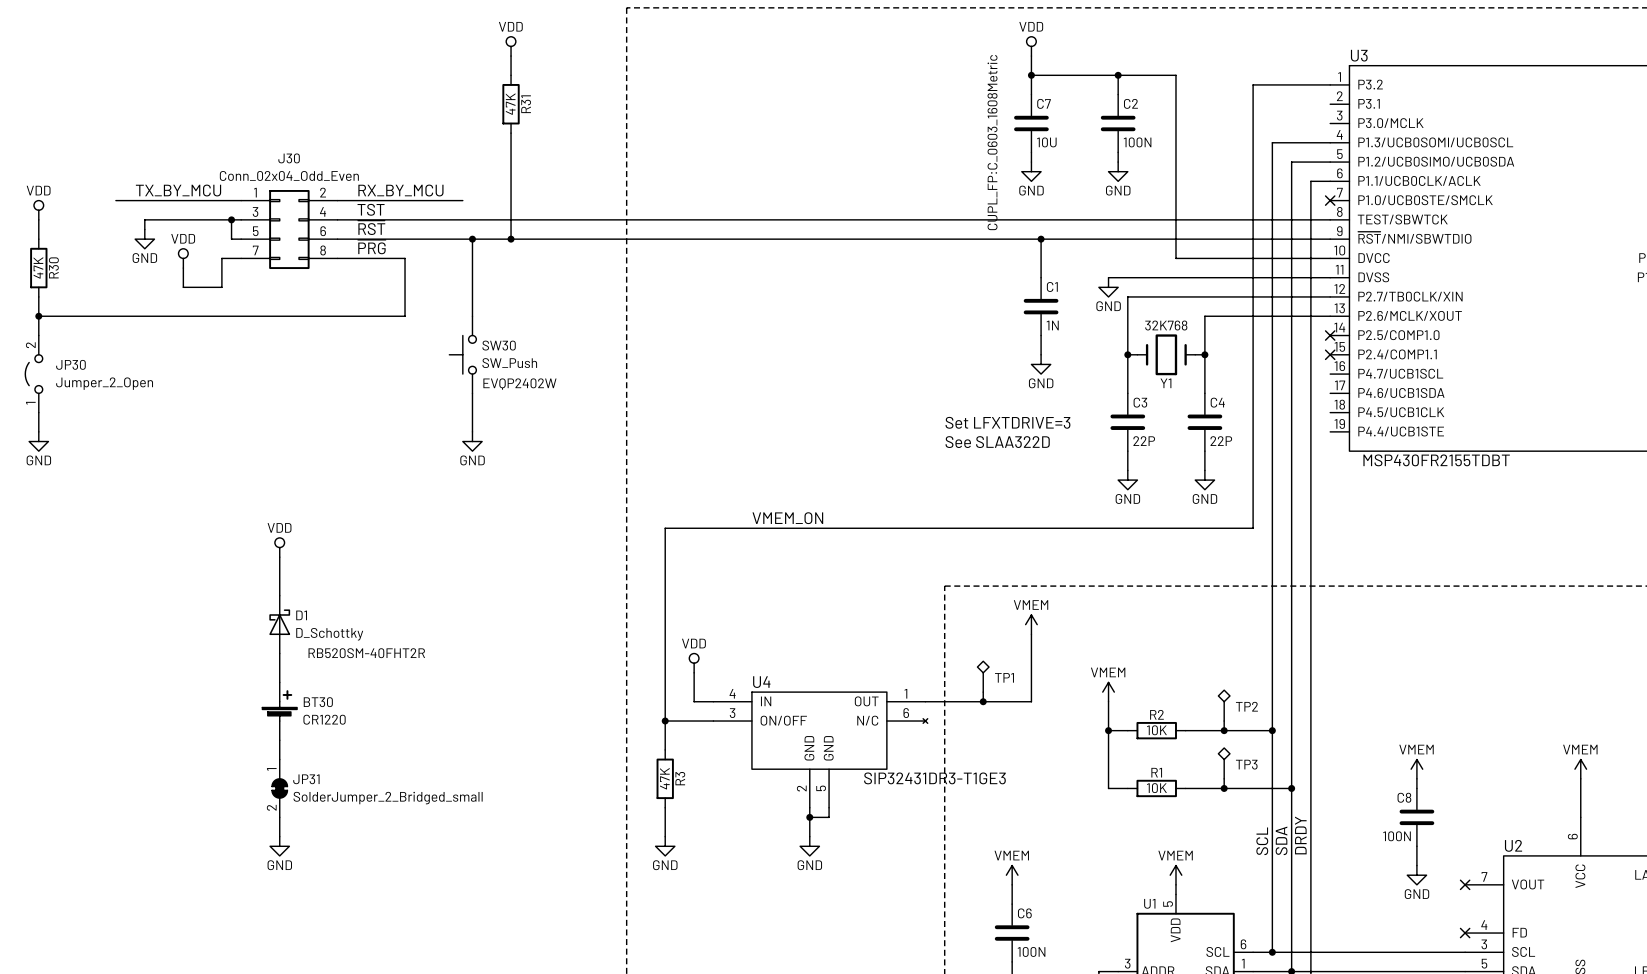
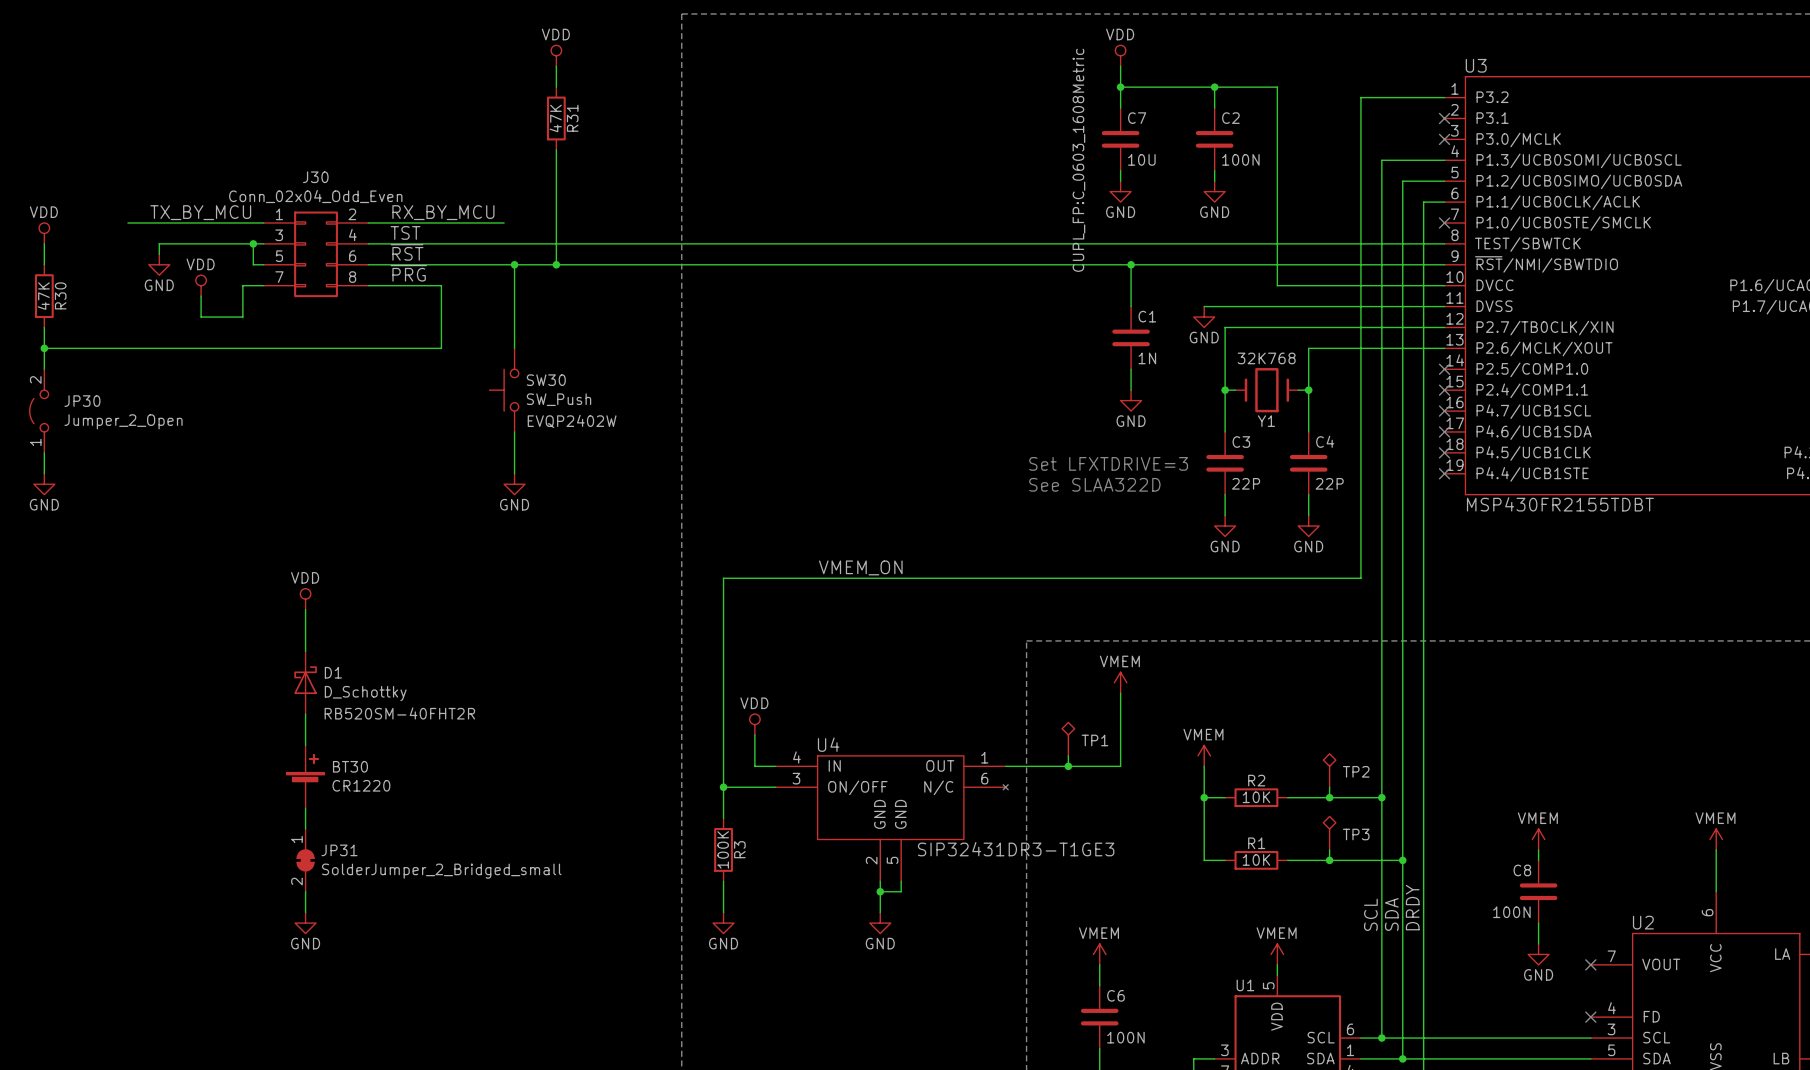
no-connect mark: none -> (1444, 118)
no-connect mark: none -> (1444, 139)
no-connect mark: none -> (1444, 411)
no-connect mark: none -> (1444, 431)
no-connect mark: none -> (1444, 452)
no-connect mark: none -> (1444, 473)
R3 value: 47K (664, 778) -> 100K (723, 849)

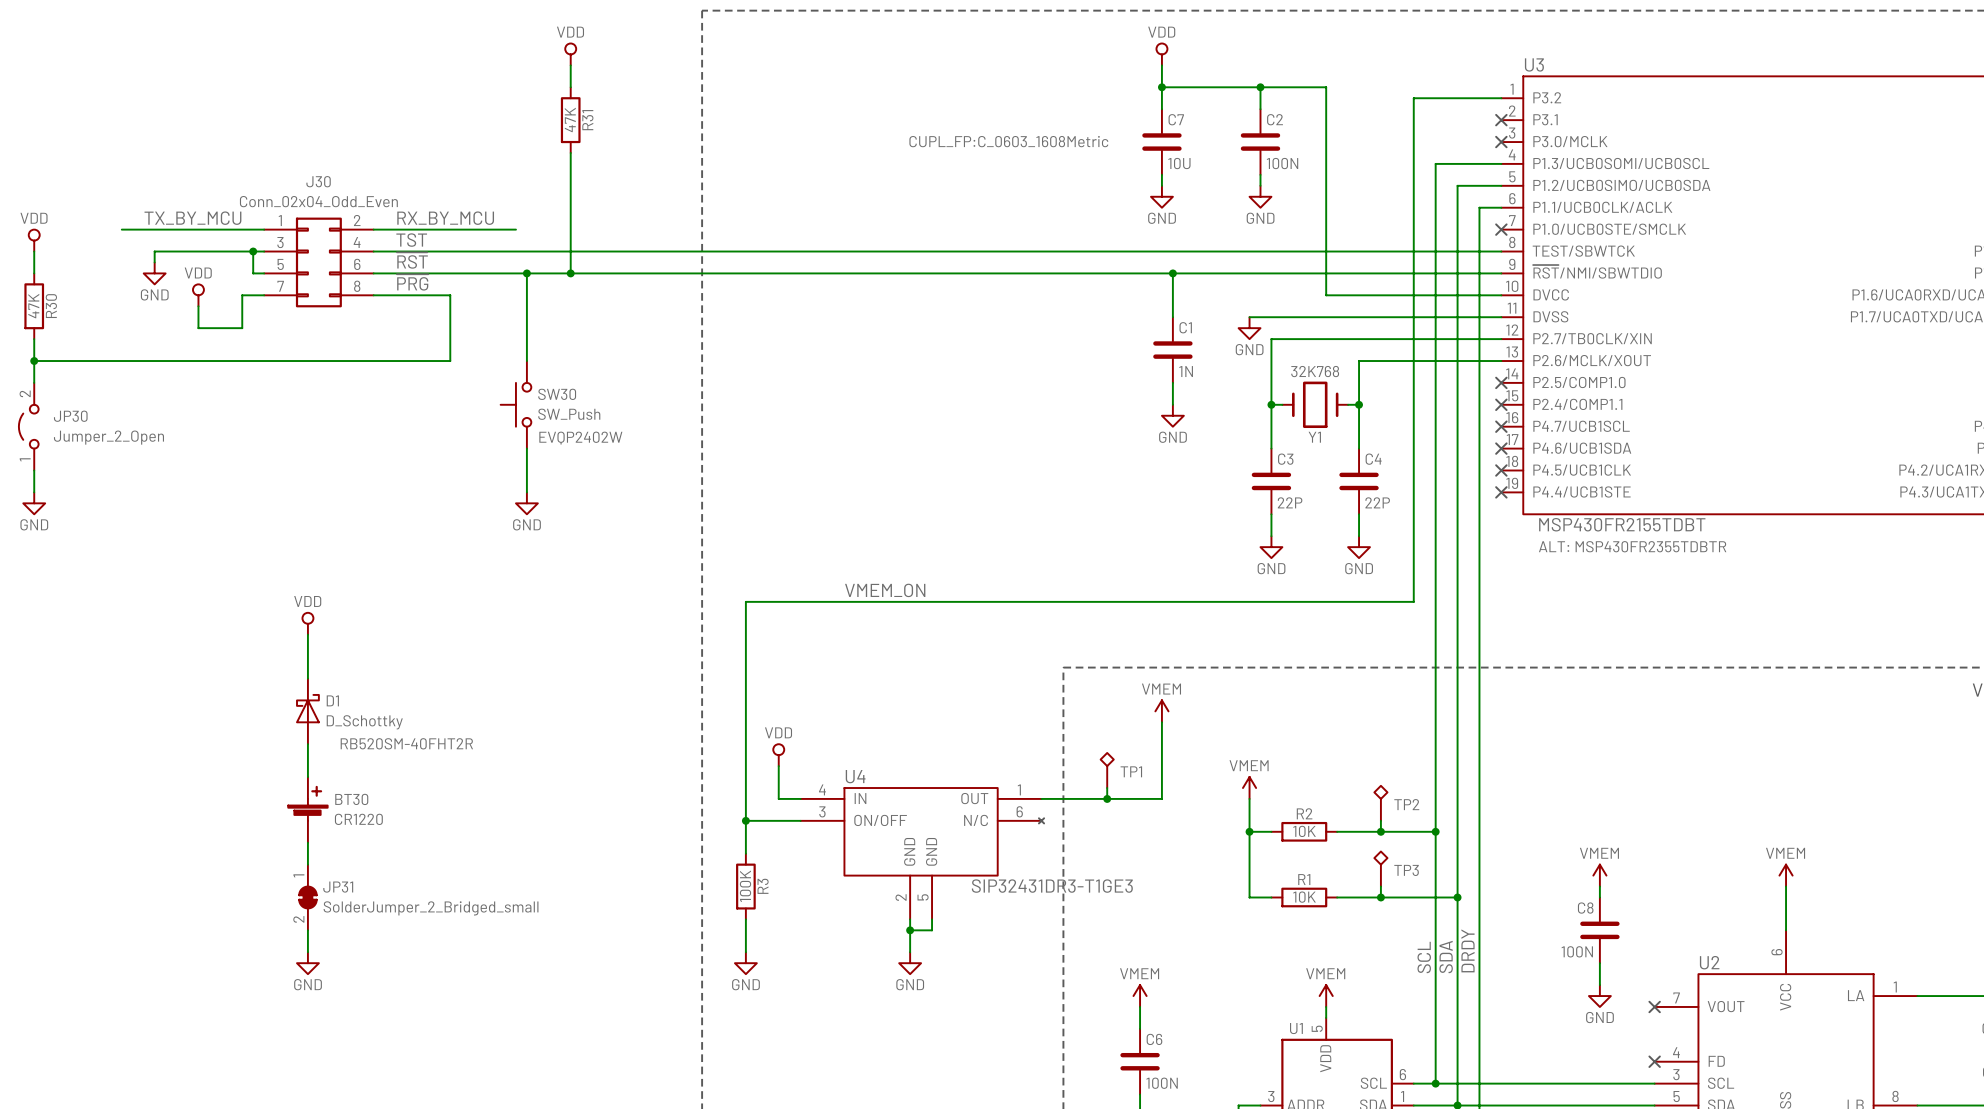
C7 text rotation: 0° (1078, 160) -> 90° clockwise (1008, 141)
text: Set LFXTDRIVE=3 (1108, 463) -> none
text: See SLAA322D (1094, 484) -> none
U3 text: none -> ALT: MSP430FR2355TDBTR (1632, 546)

